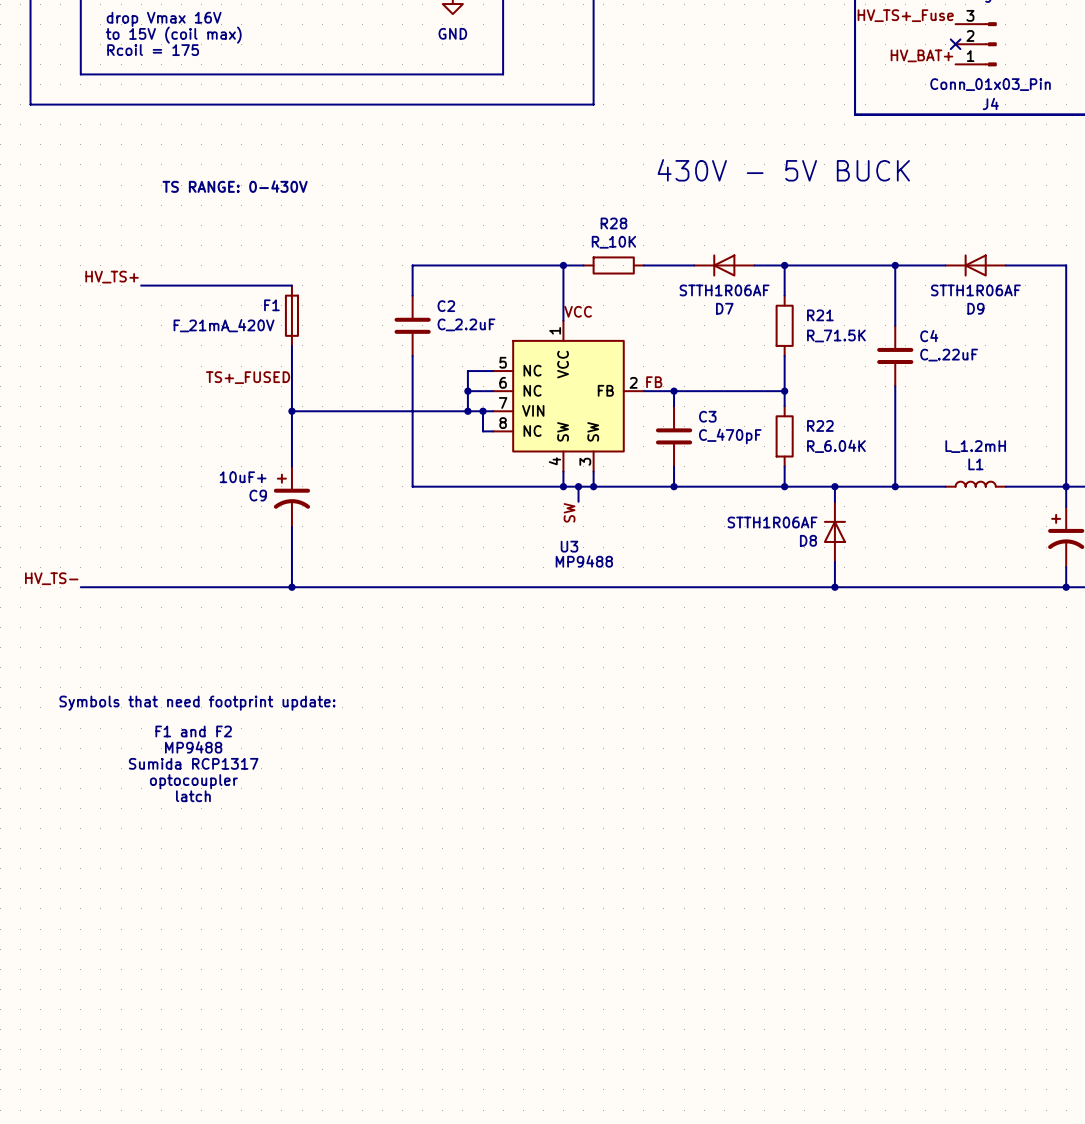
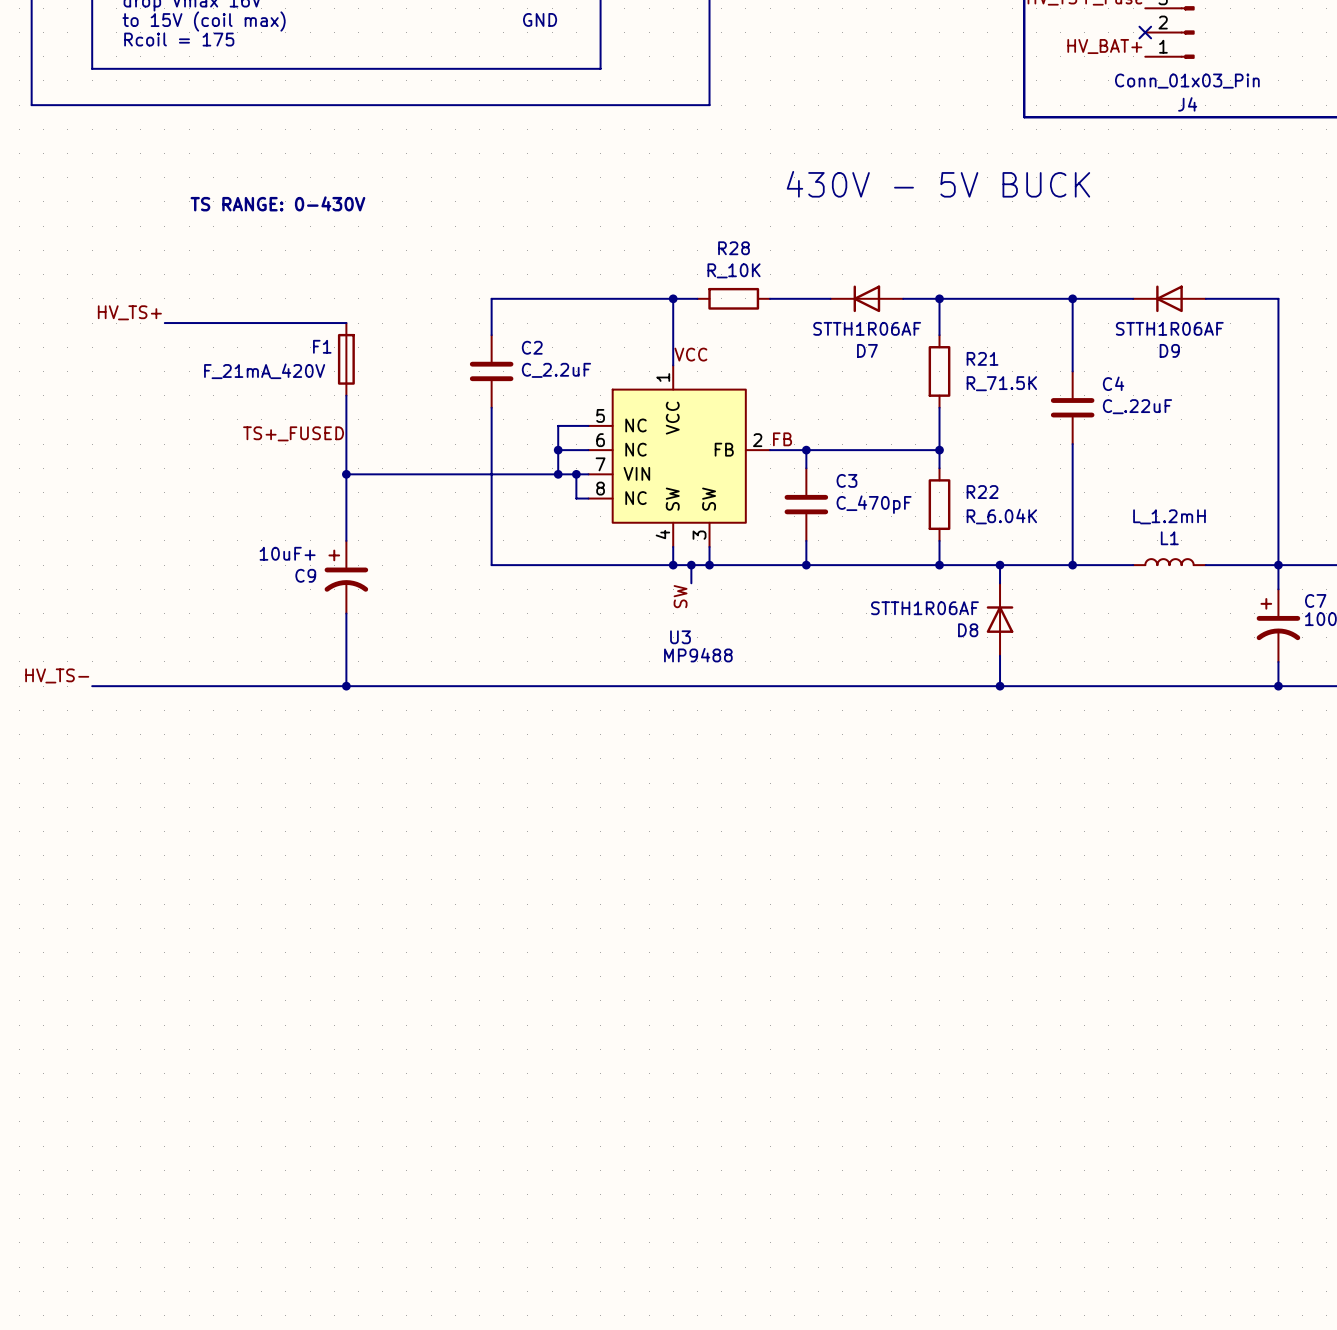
text: Symbols that need footprint update: (197, 703) -> none
text: F1 and F2 (193, 731) -> none
text: MP9488 (193, 747) -> none
text: Sumida RCP1317 (193, 763) -> none
text: optocoupler (193, 781) -> none
text: latch (193, 796) -> none

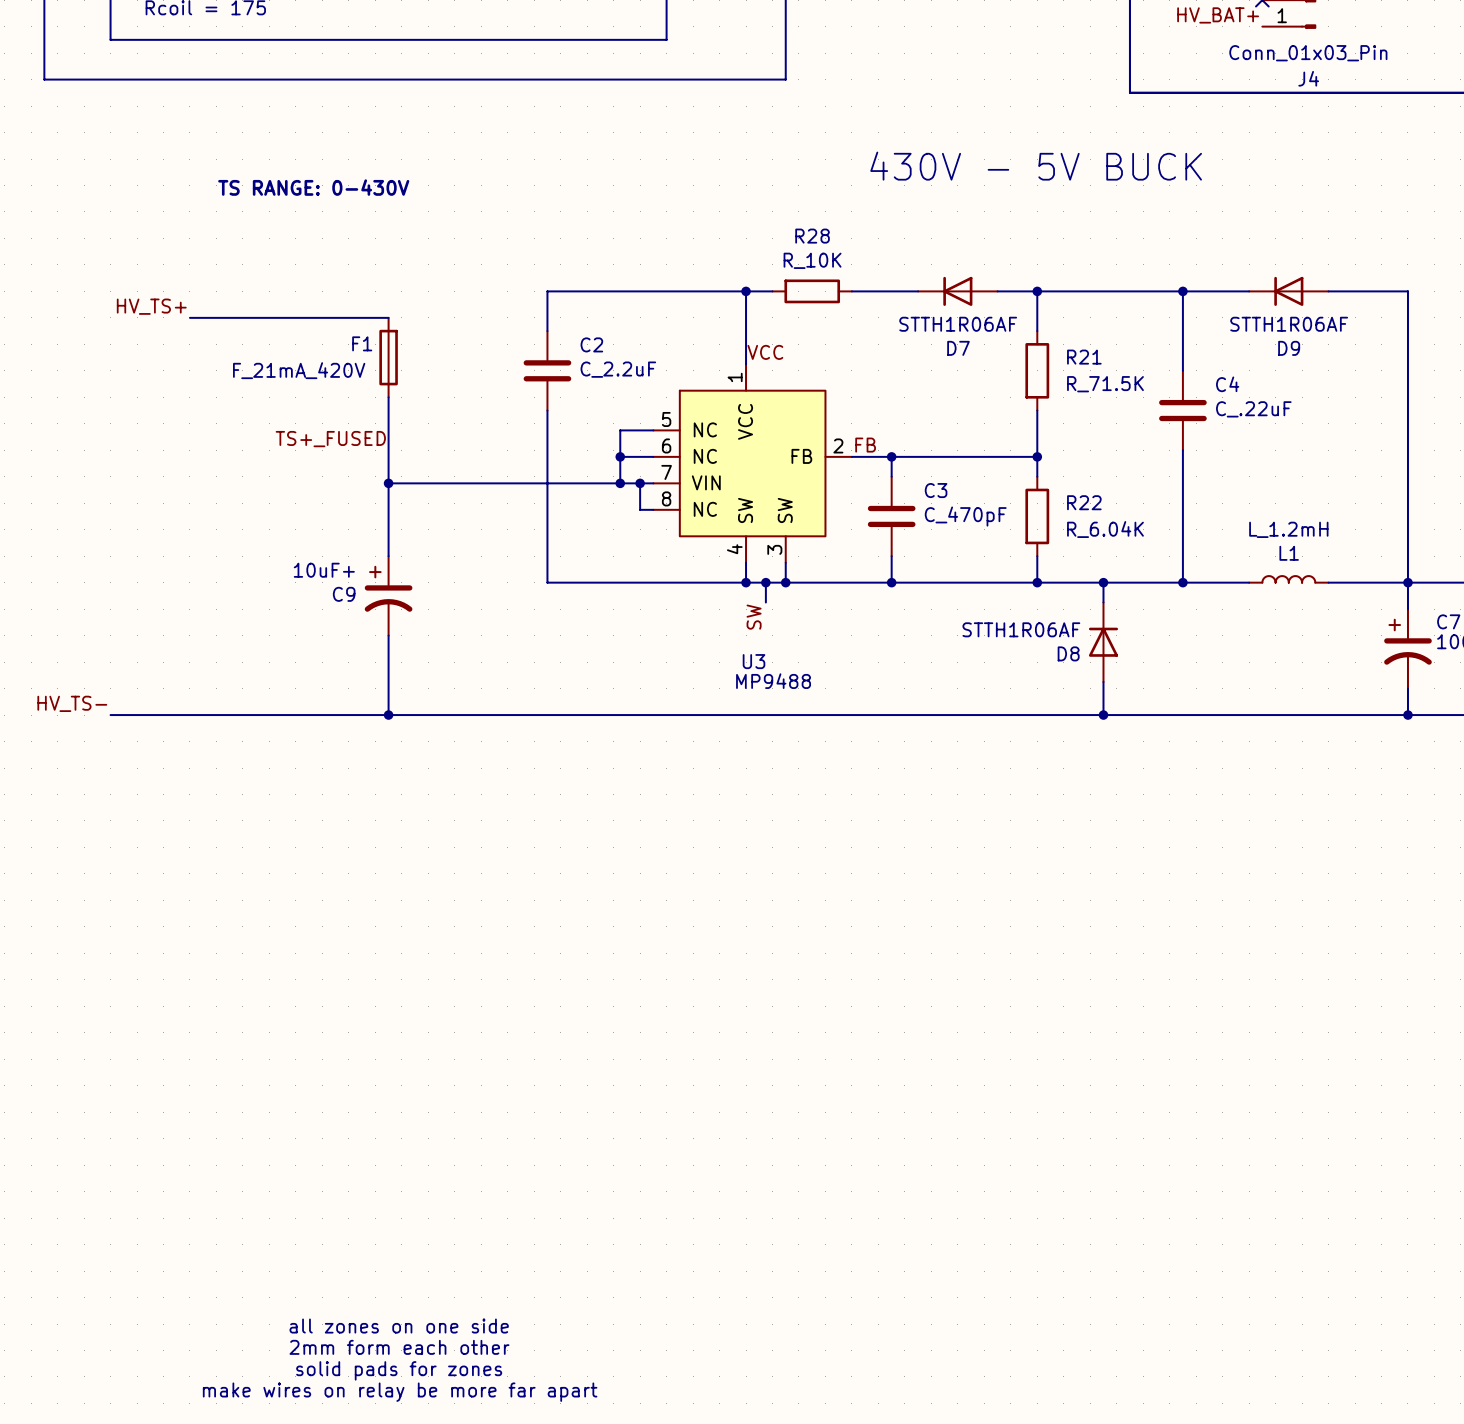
text: none -> all zones on one side (399, 1326)
text: none -> 2mm form each other (399, 1347)
text: none -> solid pads for zones (399, 1370)
text: none -> make wires on relay be more far apart (400, 1392)

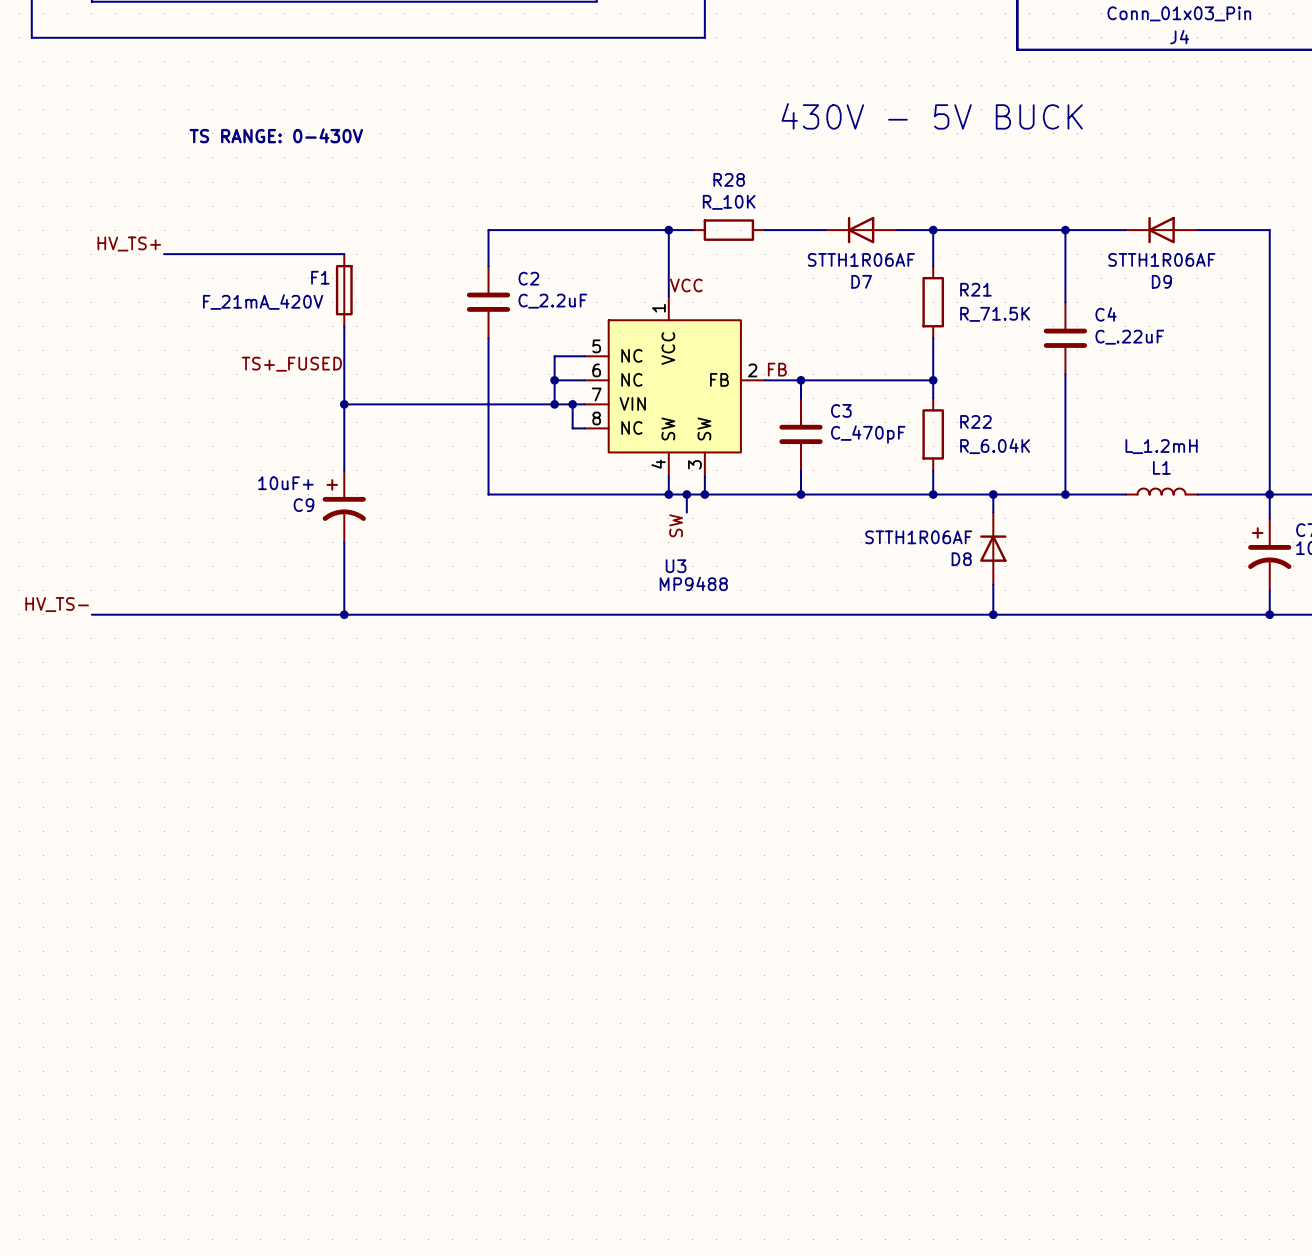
text: all zones on one side (399, 1326) -> none
text: 2mm form each other (399, 1347) -> none
text: solid pads for zones (399, 1370) -> none
text: make wires on relay be more far apart (400, 1392) -> none

